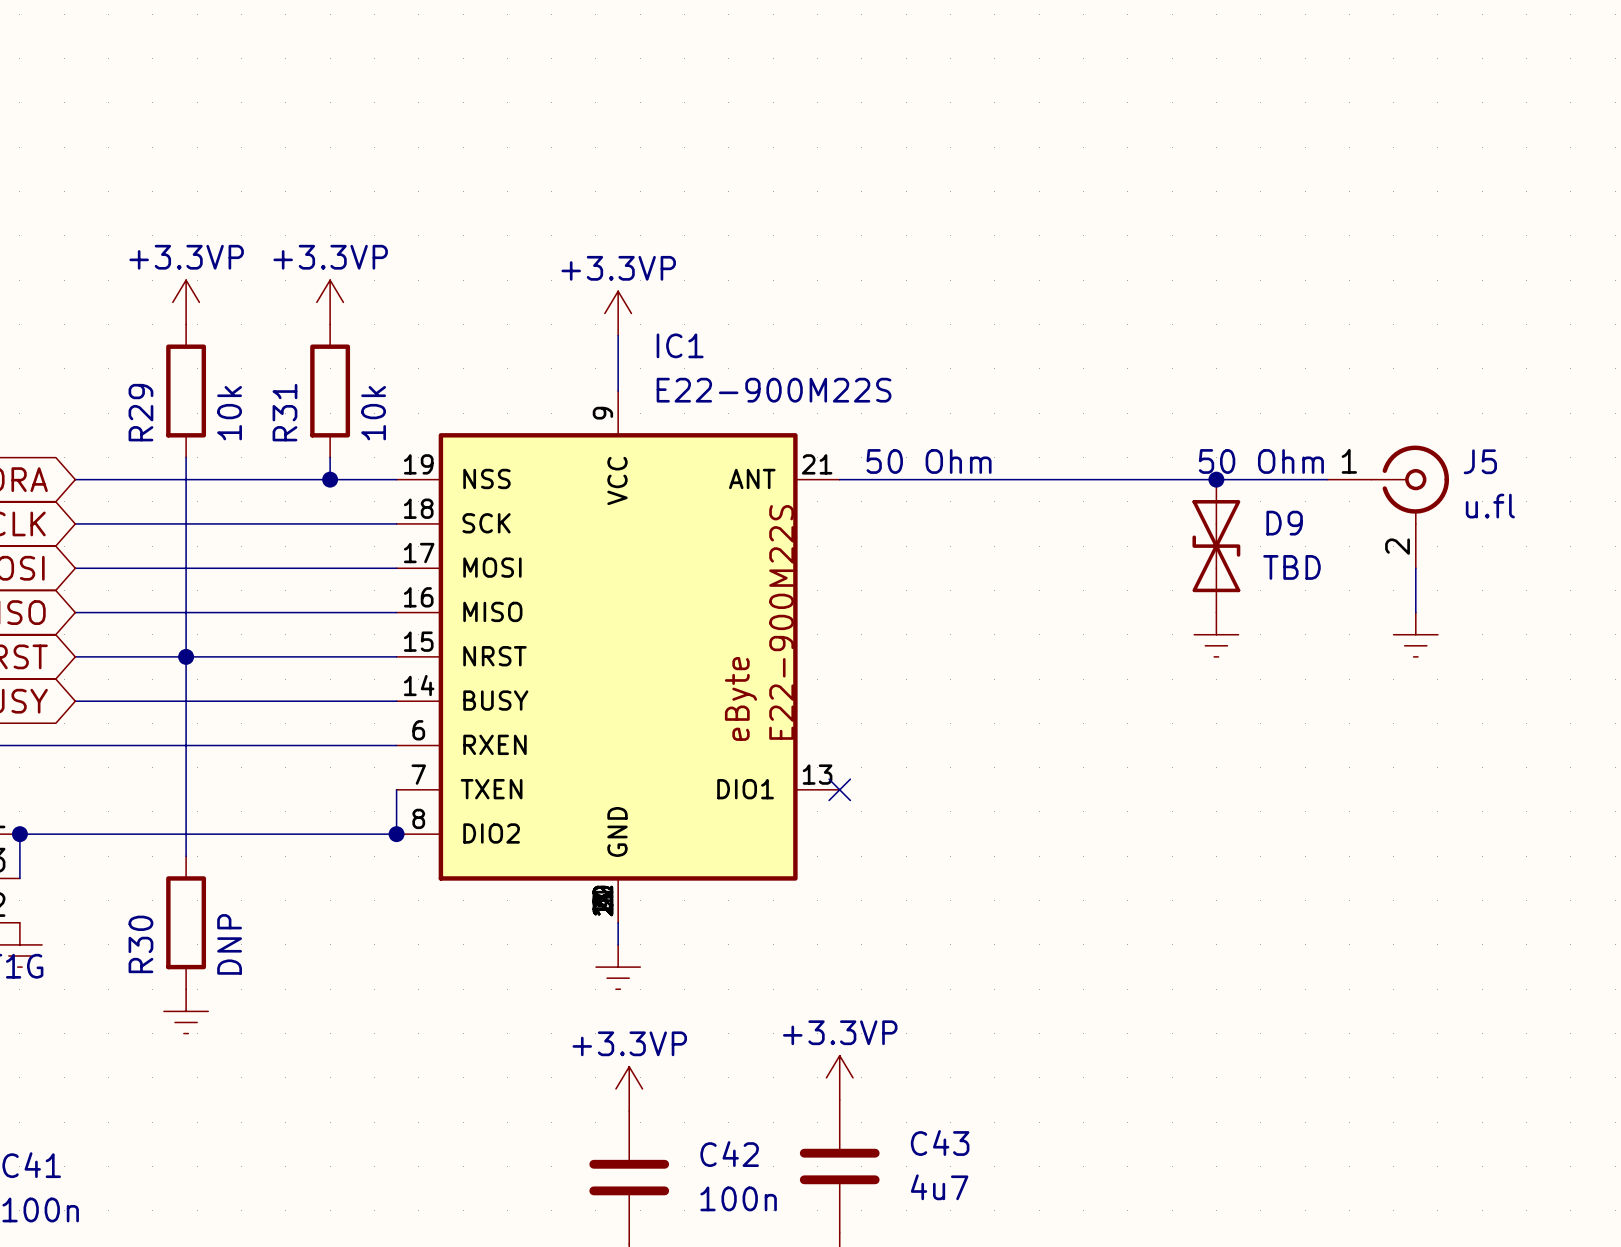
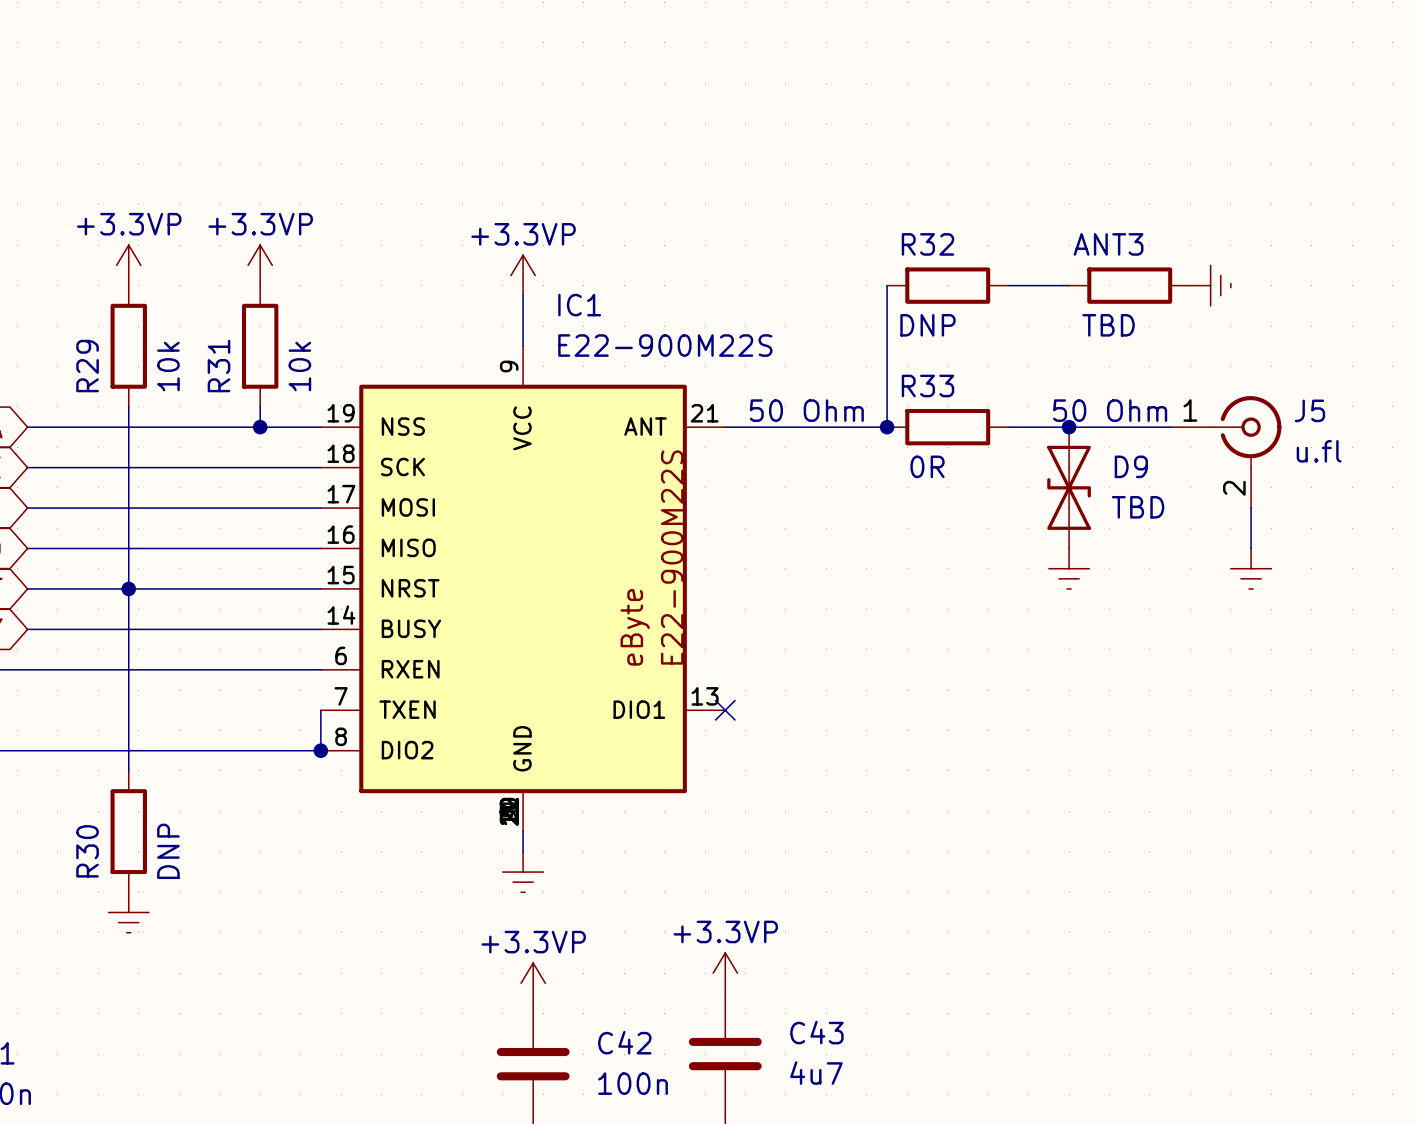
R32: none -> DNP (947, 285)
wire: none -> (1008, 285) (1069, 285)
ANT3: none -> TBD (1129, 285)
power symbol: none -> (1210, 285)
wire: (1016, 479) (1149, 479) -> (887, 427) (887, 285)
junction: none -> (887, 427)
R33: none -> 0R (947, 427)

